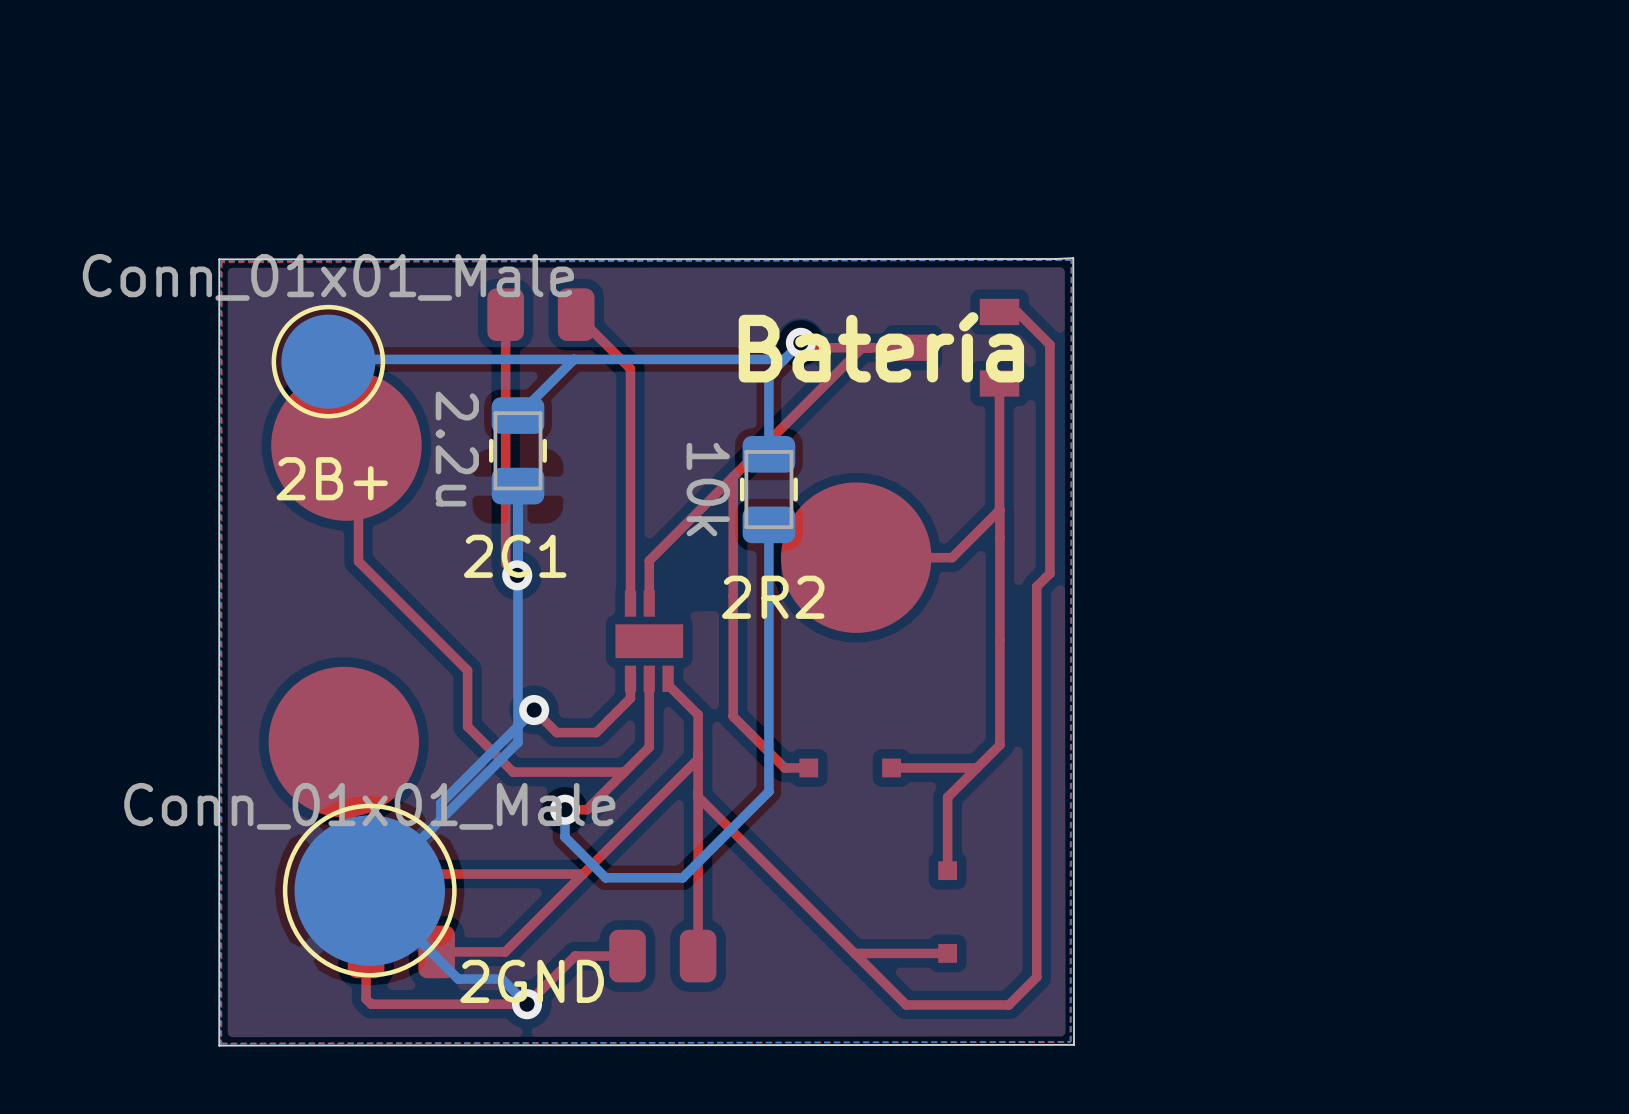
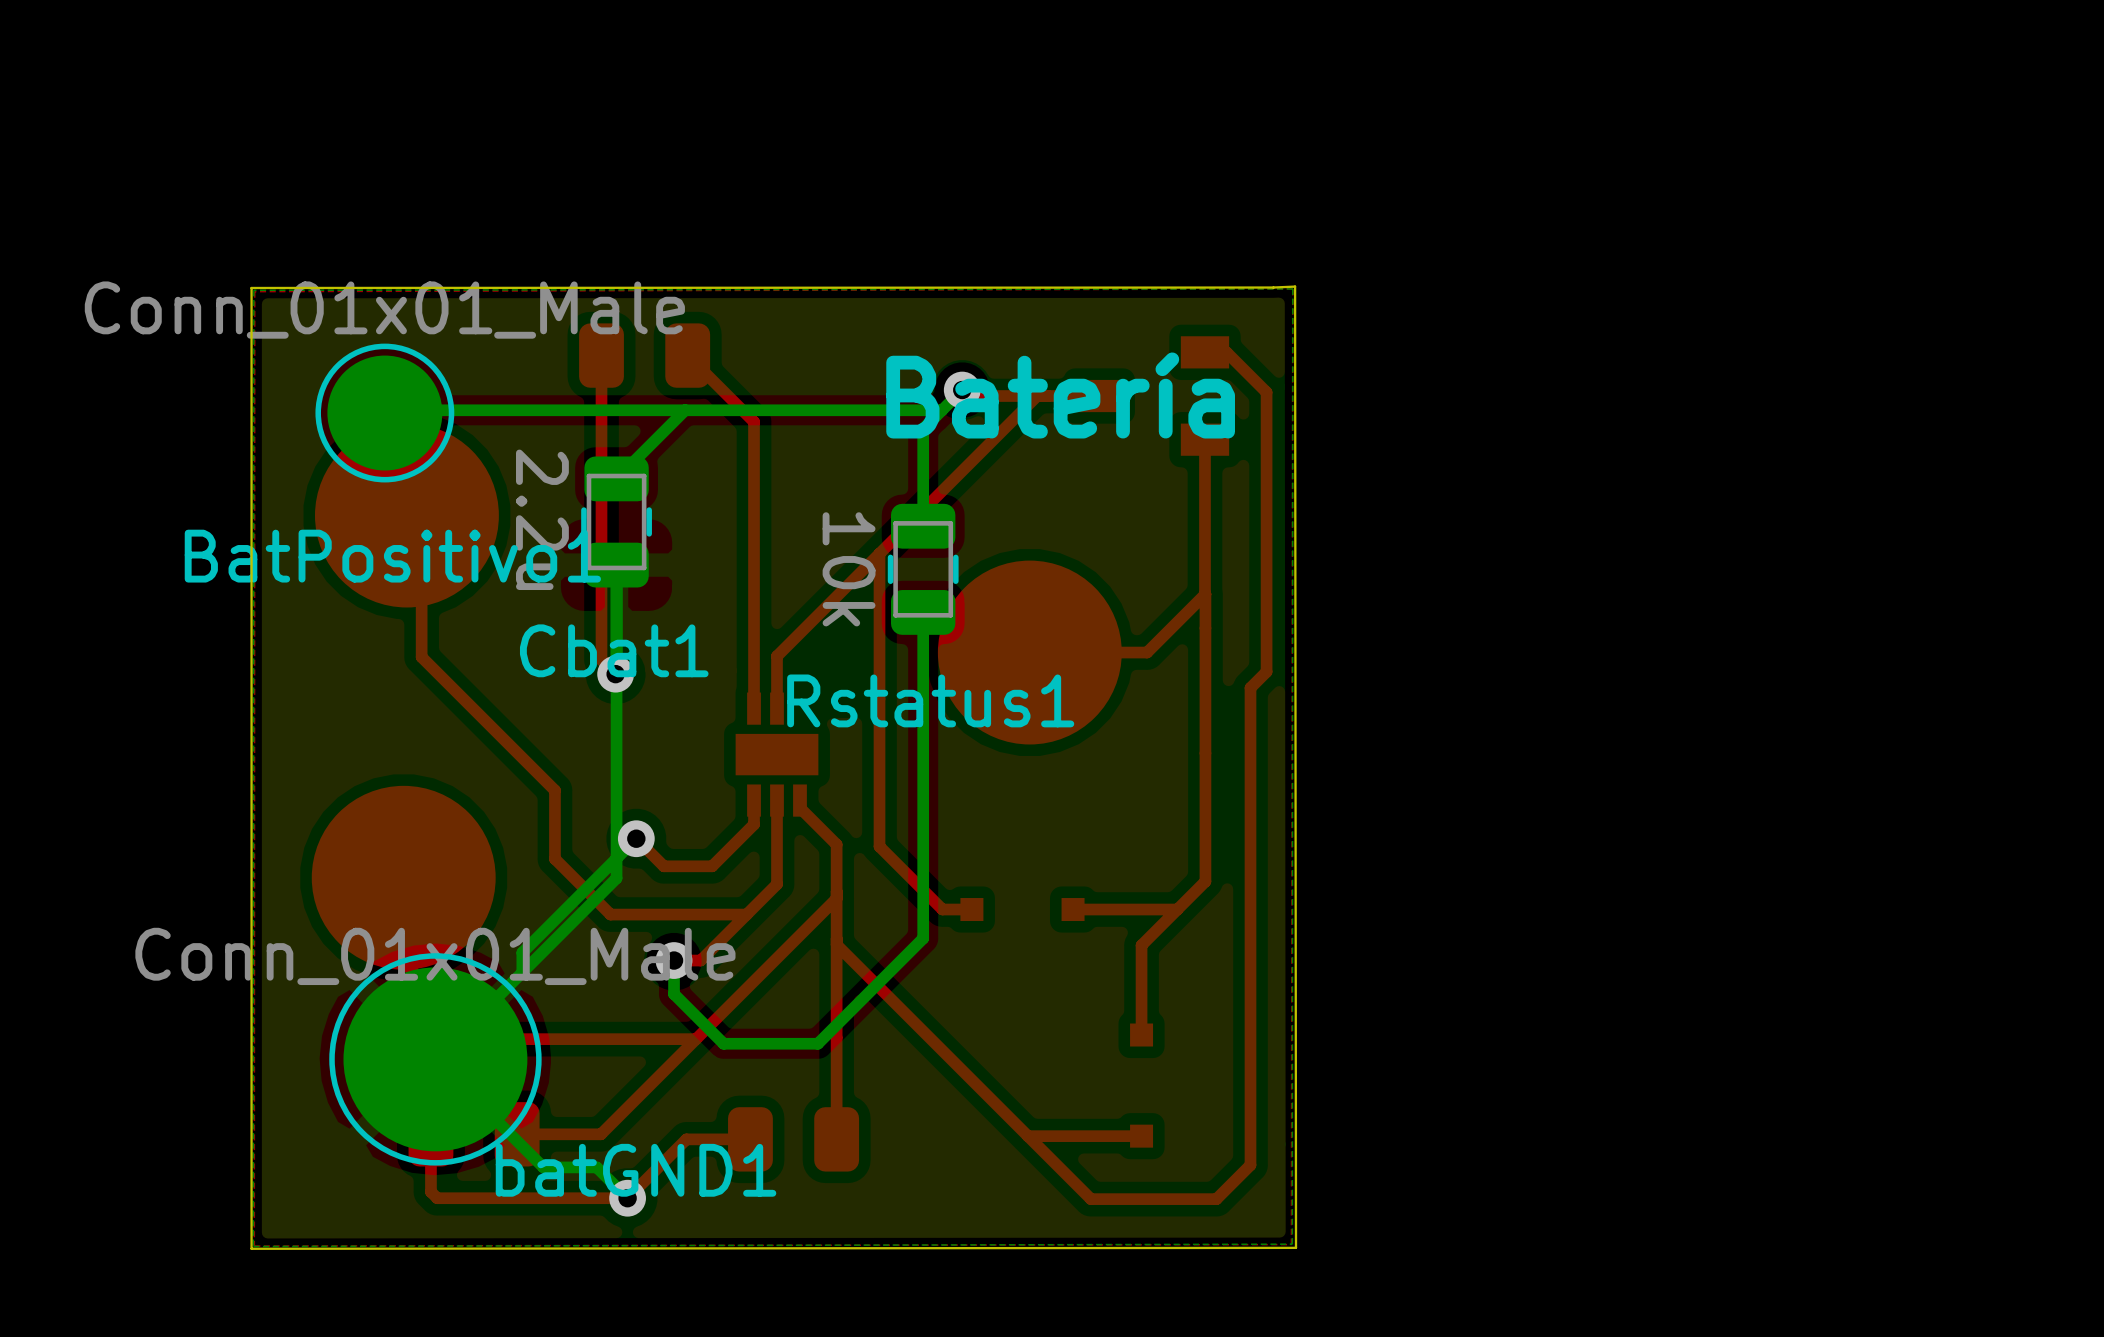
2B+ name: 2B+ (332, 478) -> BatPositivo1 (392, 556)
2C1 name: 2C1 (515, 556) -> Cbat1 (614, 650)
2R2 name: 2R2 (773, 597) -> Rstatus1 (930, 700)
2GND name: 2GND (532, 981) -> batGND1 (636, 1170)

